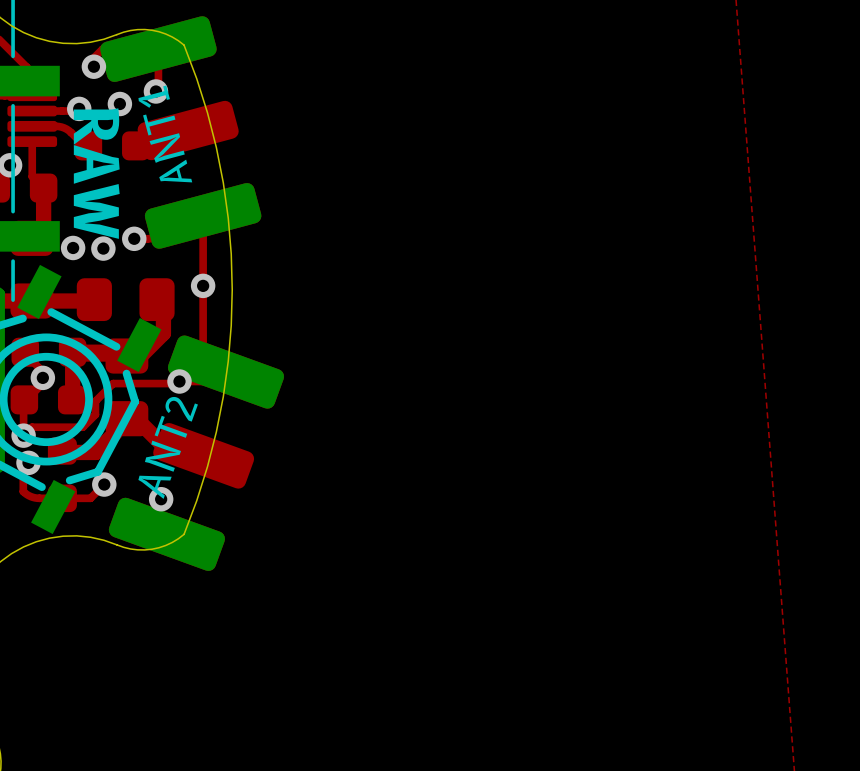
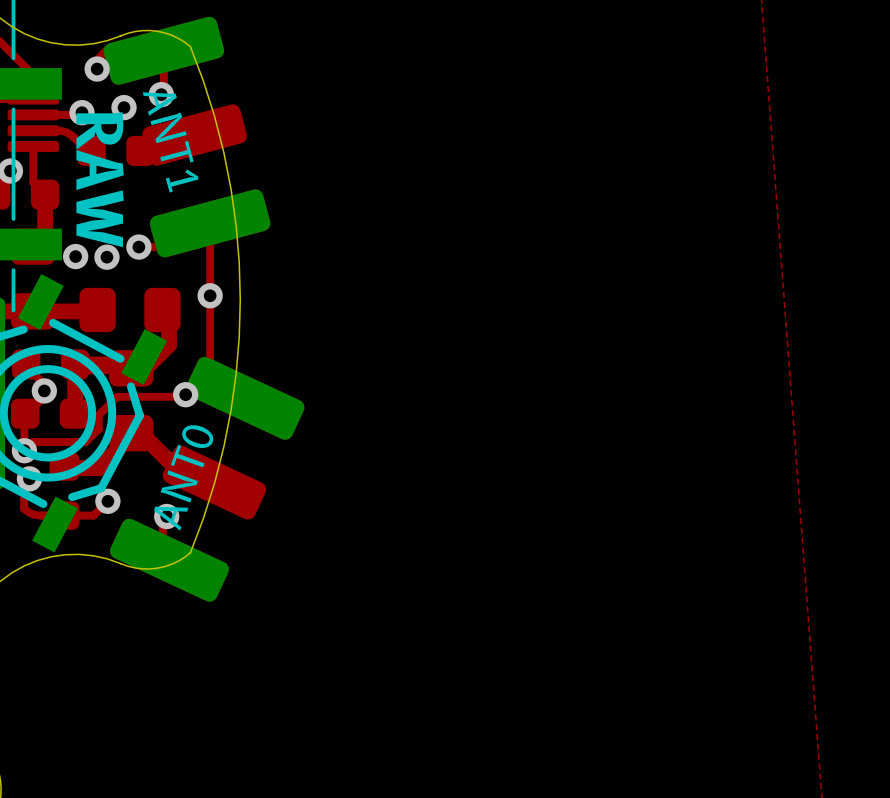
ANT1 name rotation: 0° (165, 133) -> 180° (170, 142)
ANT2: (196, 453) -> none
ANT0: none -> (207, 479)

